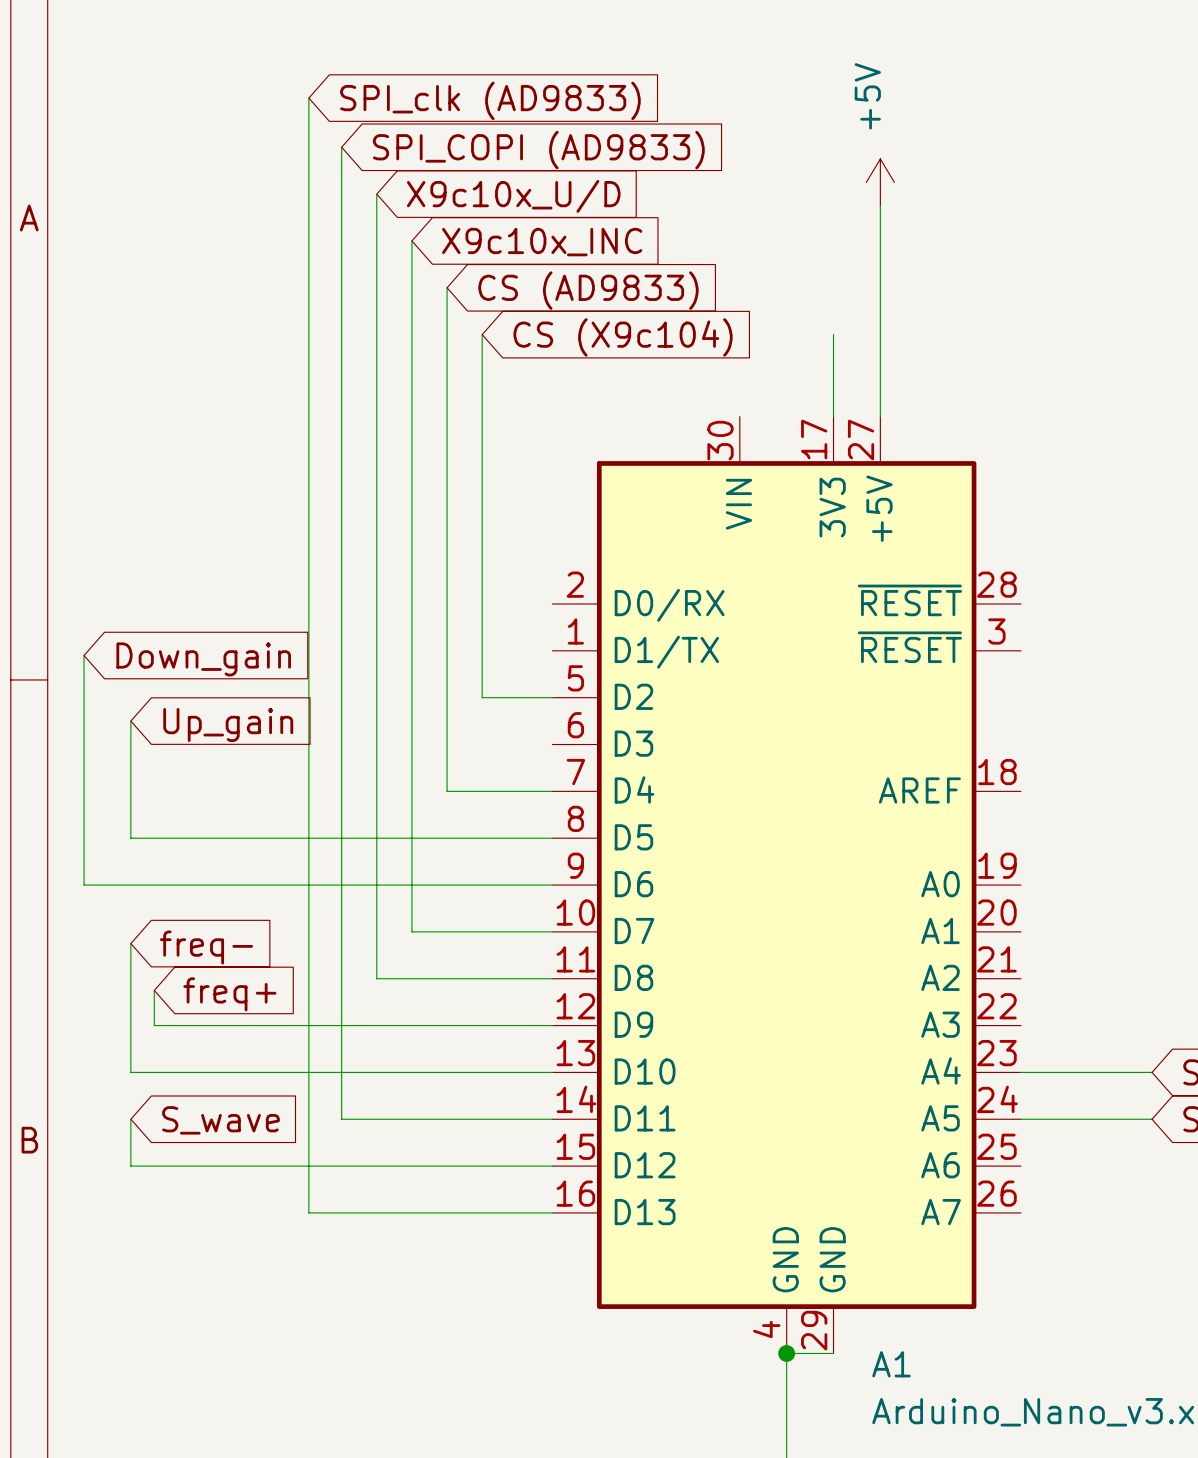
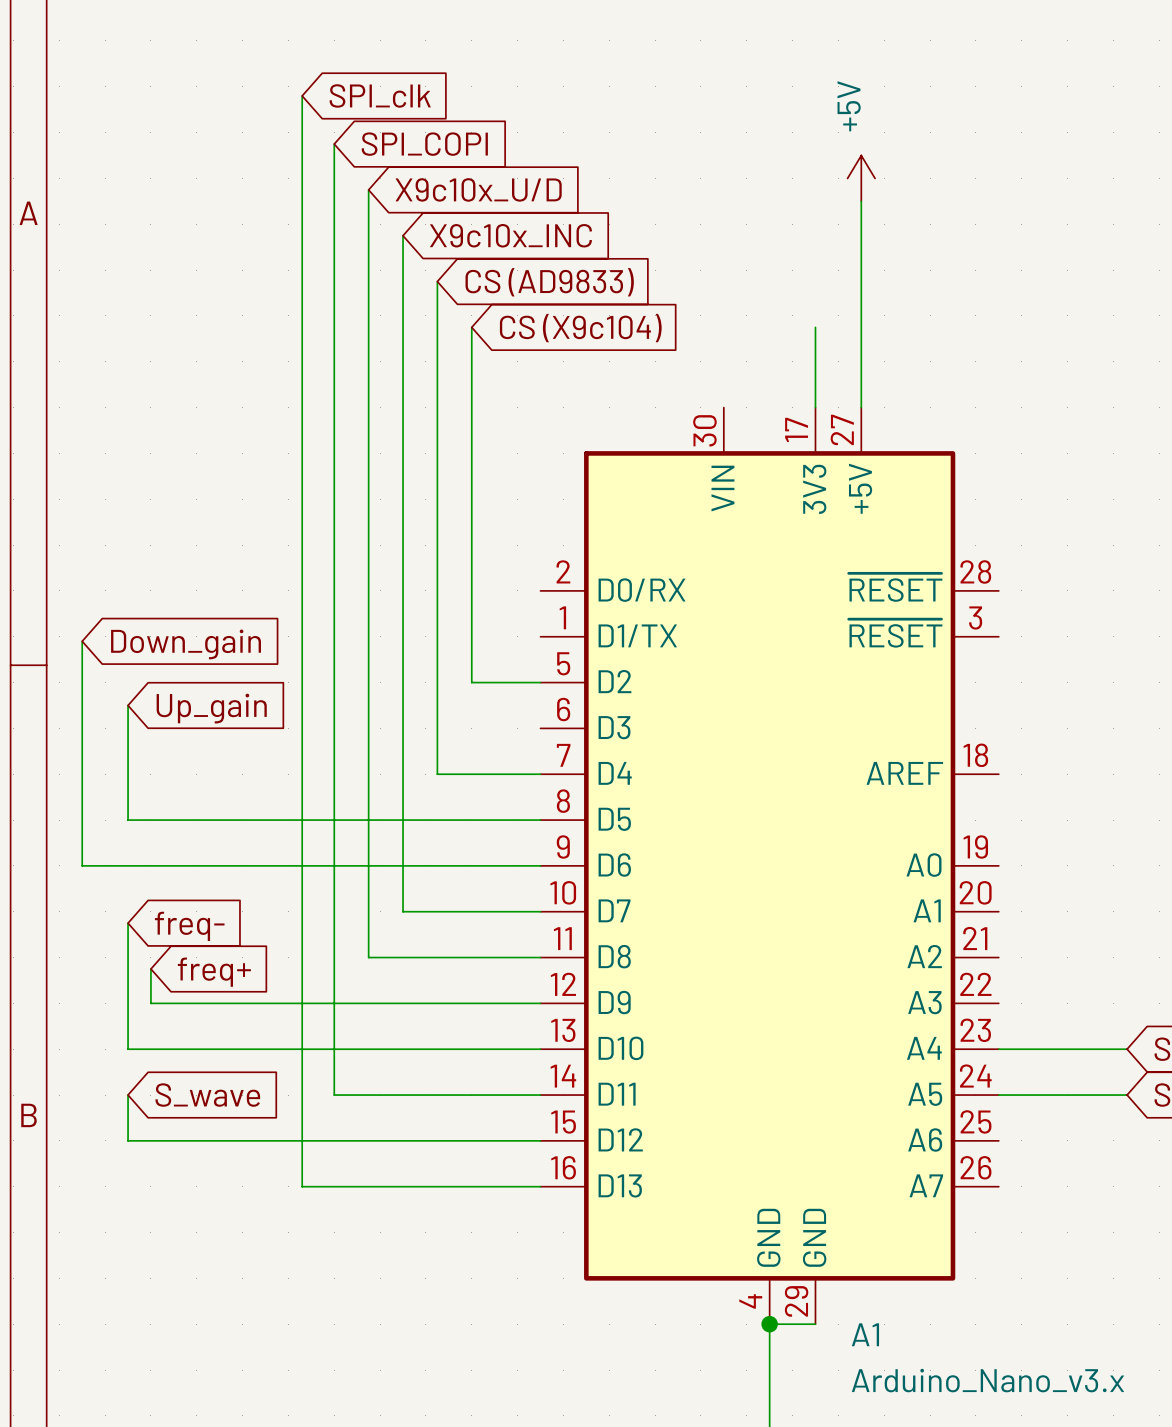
global label: SPI_clk (AD9833) (490, 100) -> SPI_clk (380, 95)
global label: SPI_COPI (AD9833) (538, 150) -> SPI_COPI (424, 144)

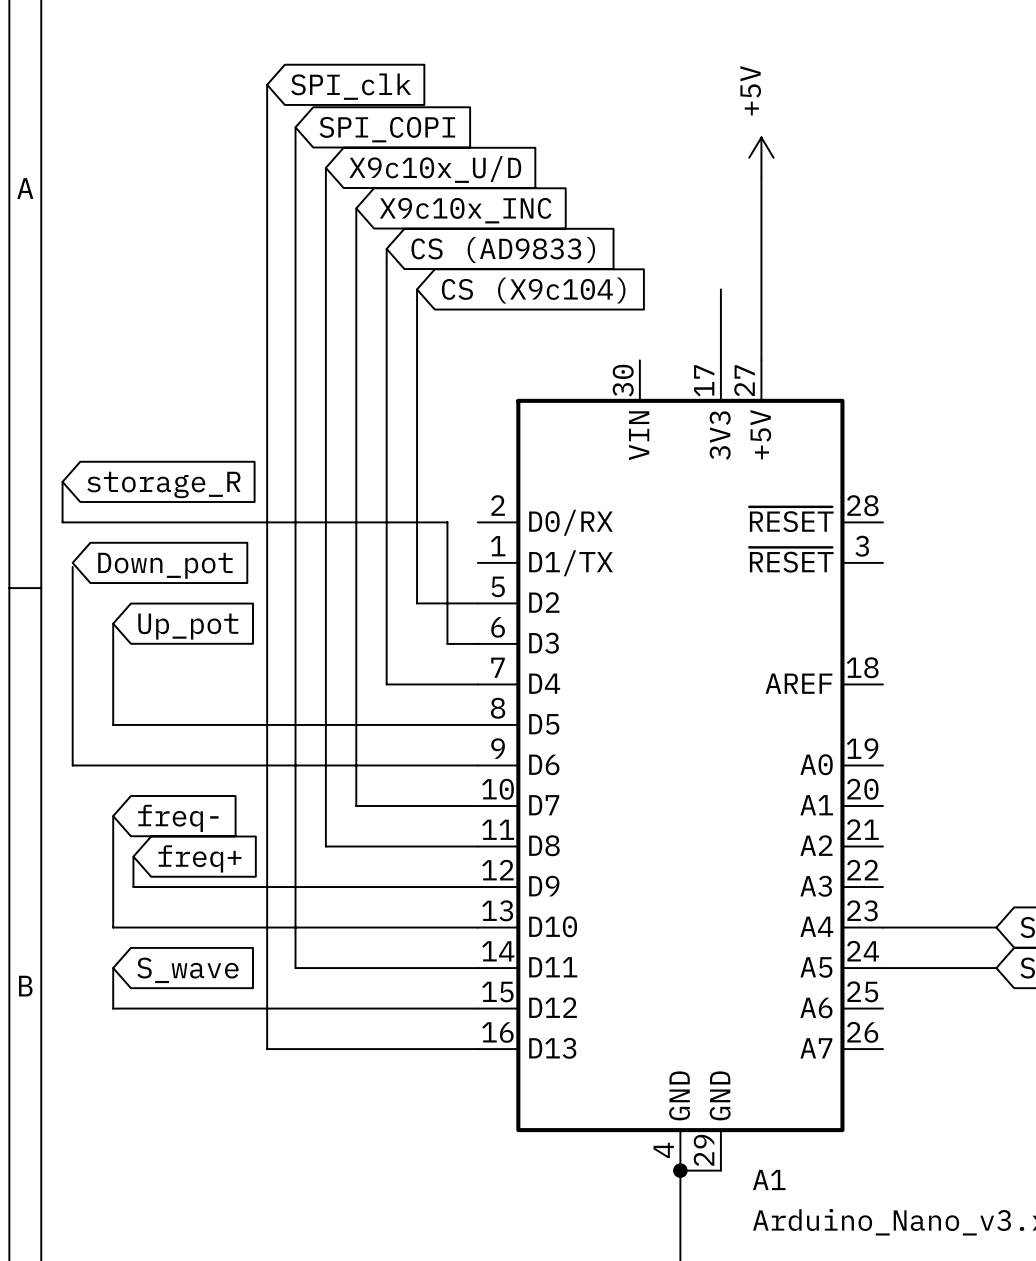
wire: none -> (62, 481) (62, 522) (447, 522) (447, 643) (477, 643)
global label: none -> storage_R (163, 484)
global label: Down_gain (186, 644) -> Down_pot (165, 565)
global label: Up_gain (211, 708) -> Up_pot (188, 626)

